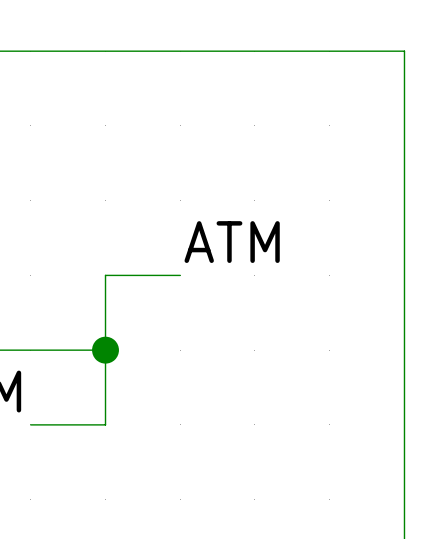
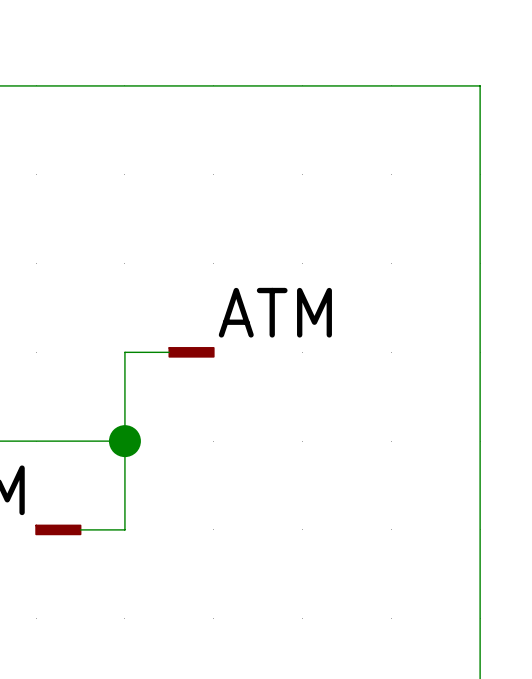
part: none -> (191, 352)
part: none -> (58, 529)

